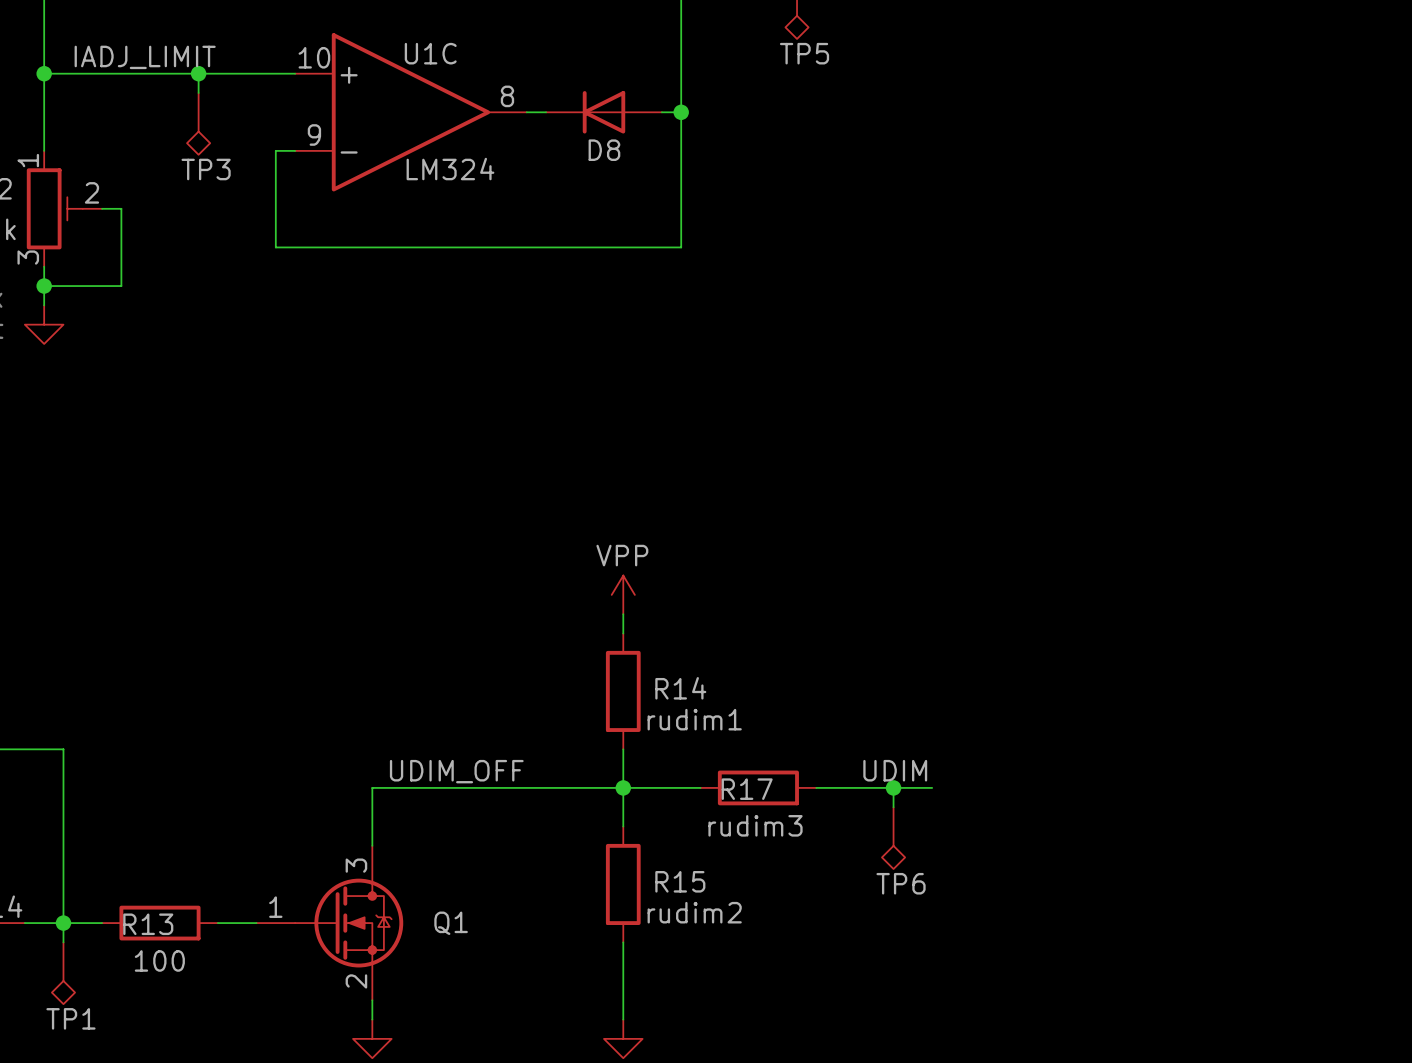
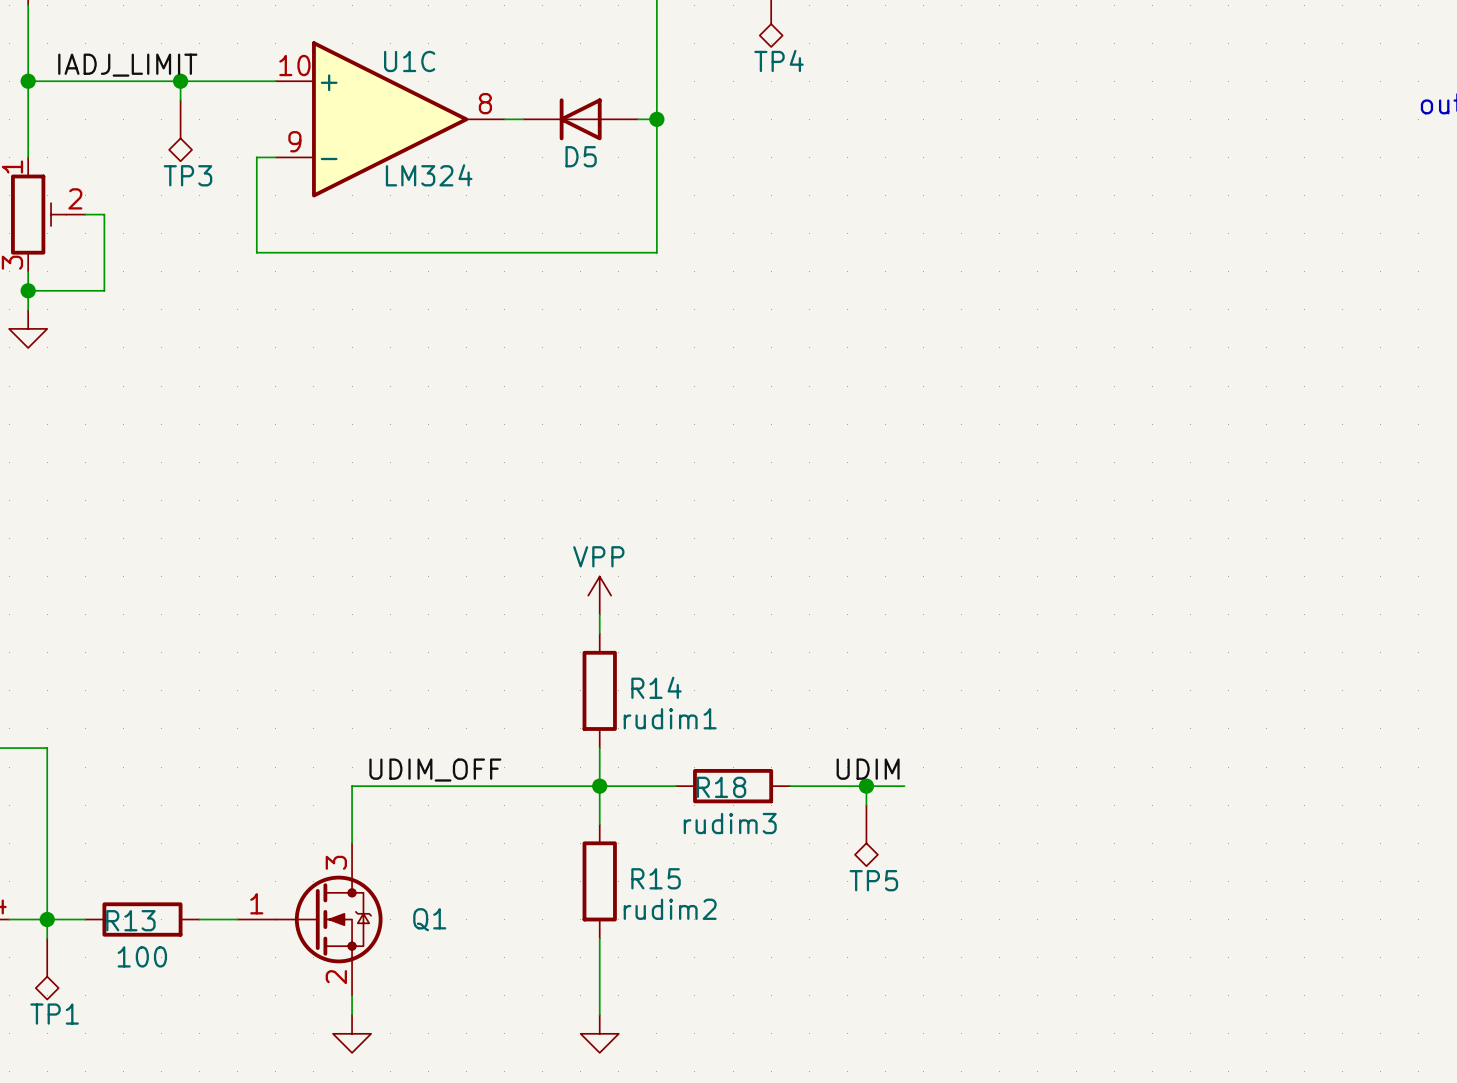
TP5 name: TP5 (804, 53) -> TP4 (779, 61)
D8 name: D8 (604, 150) -> D5 (581, 156)
R17 name: R17 (747, 789) -> R18 (721, 787)
TP6 name: TP6 (901, 883) -> TP5 (873, 880)

